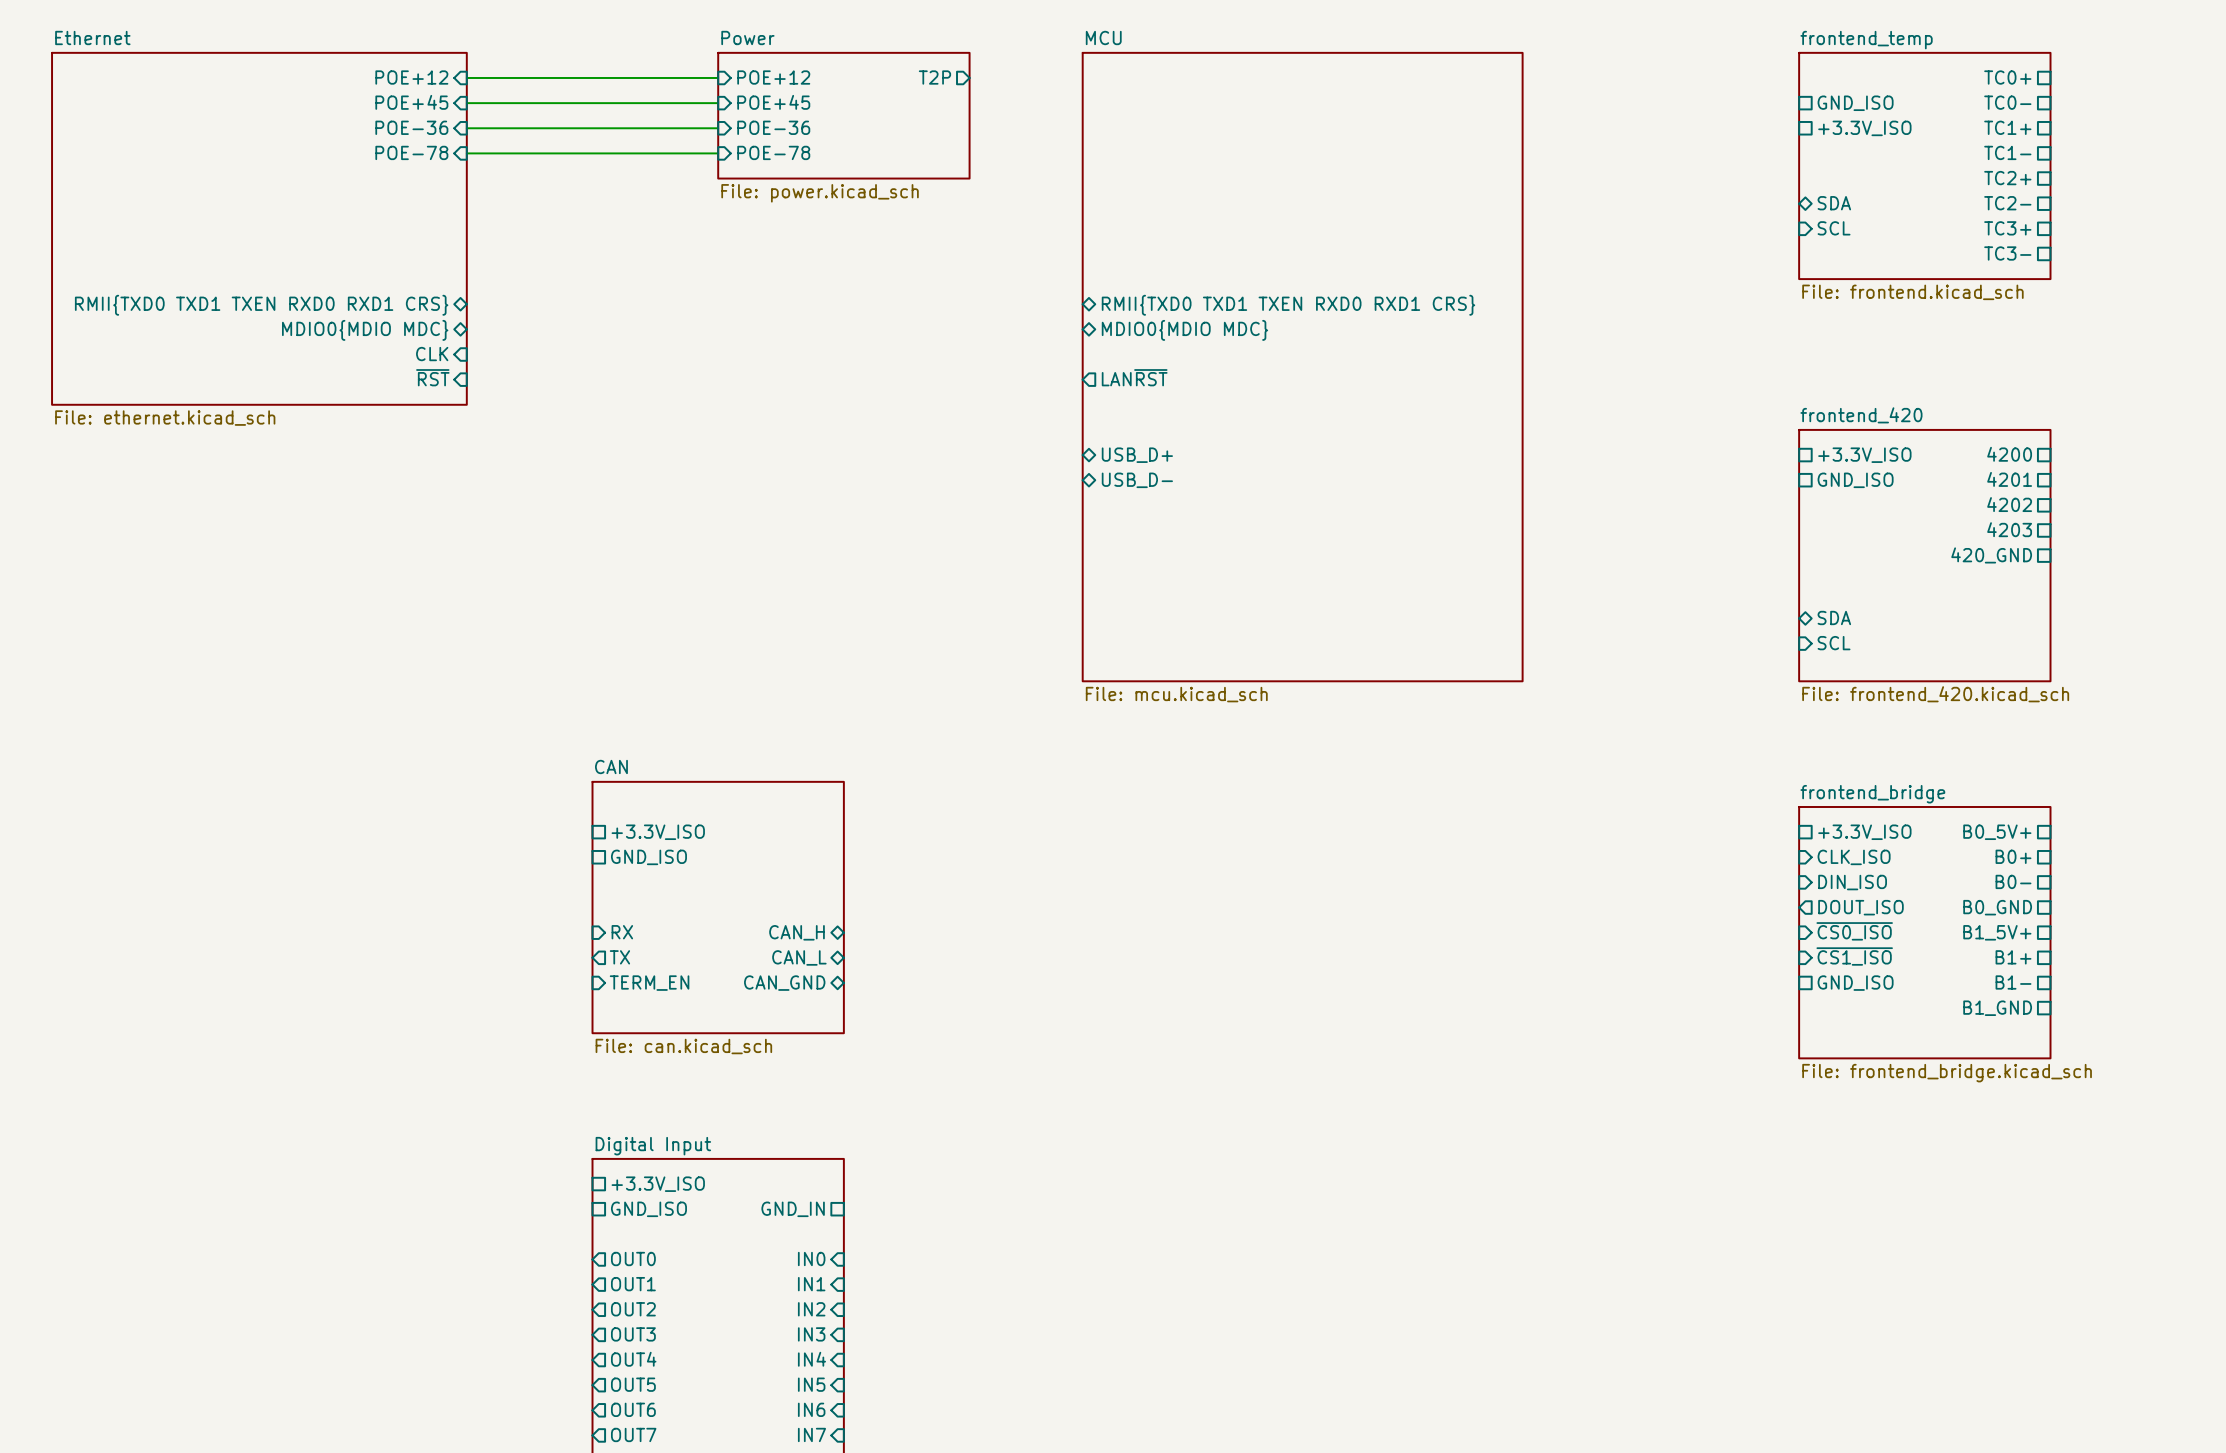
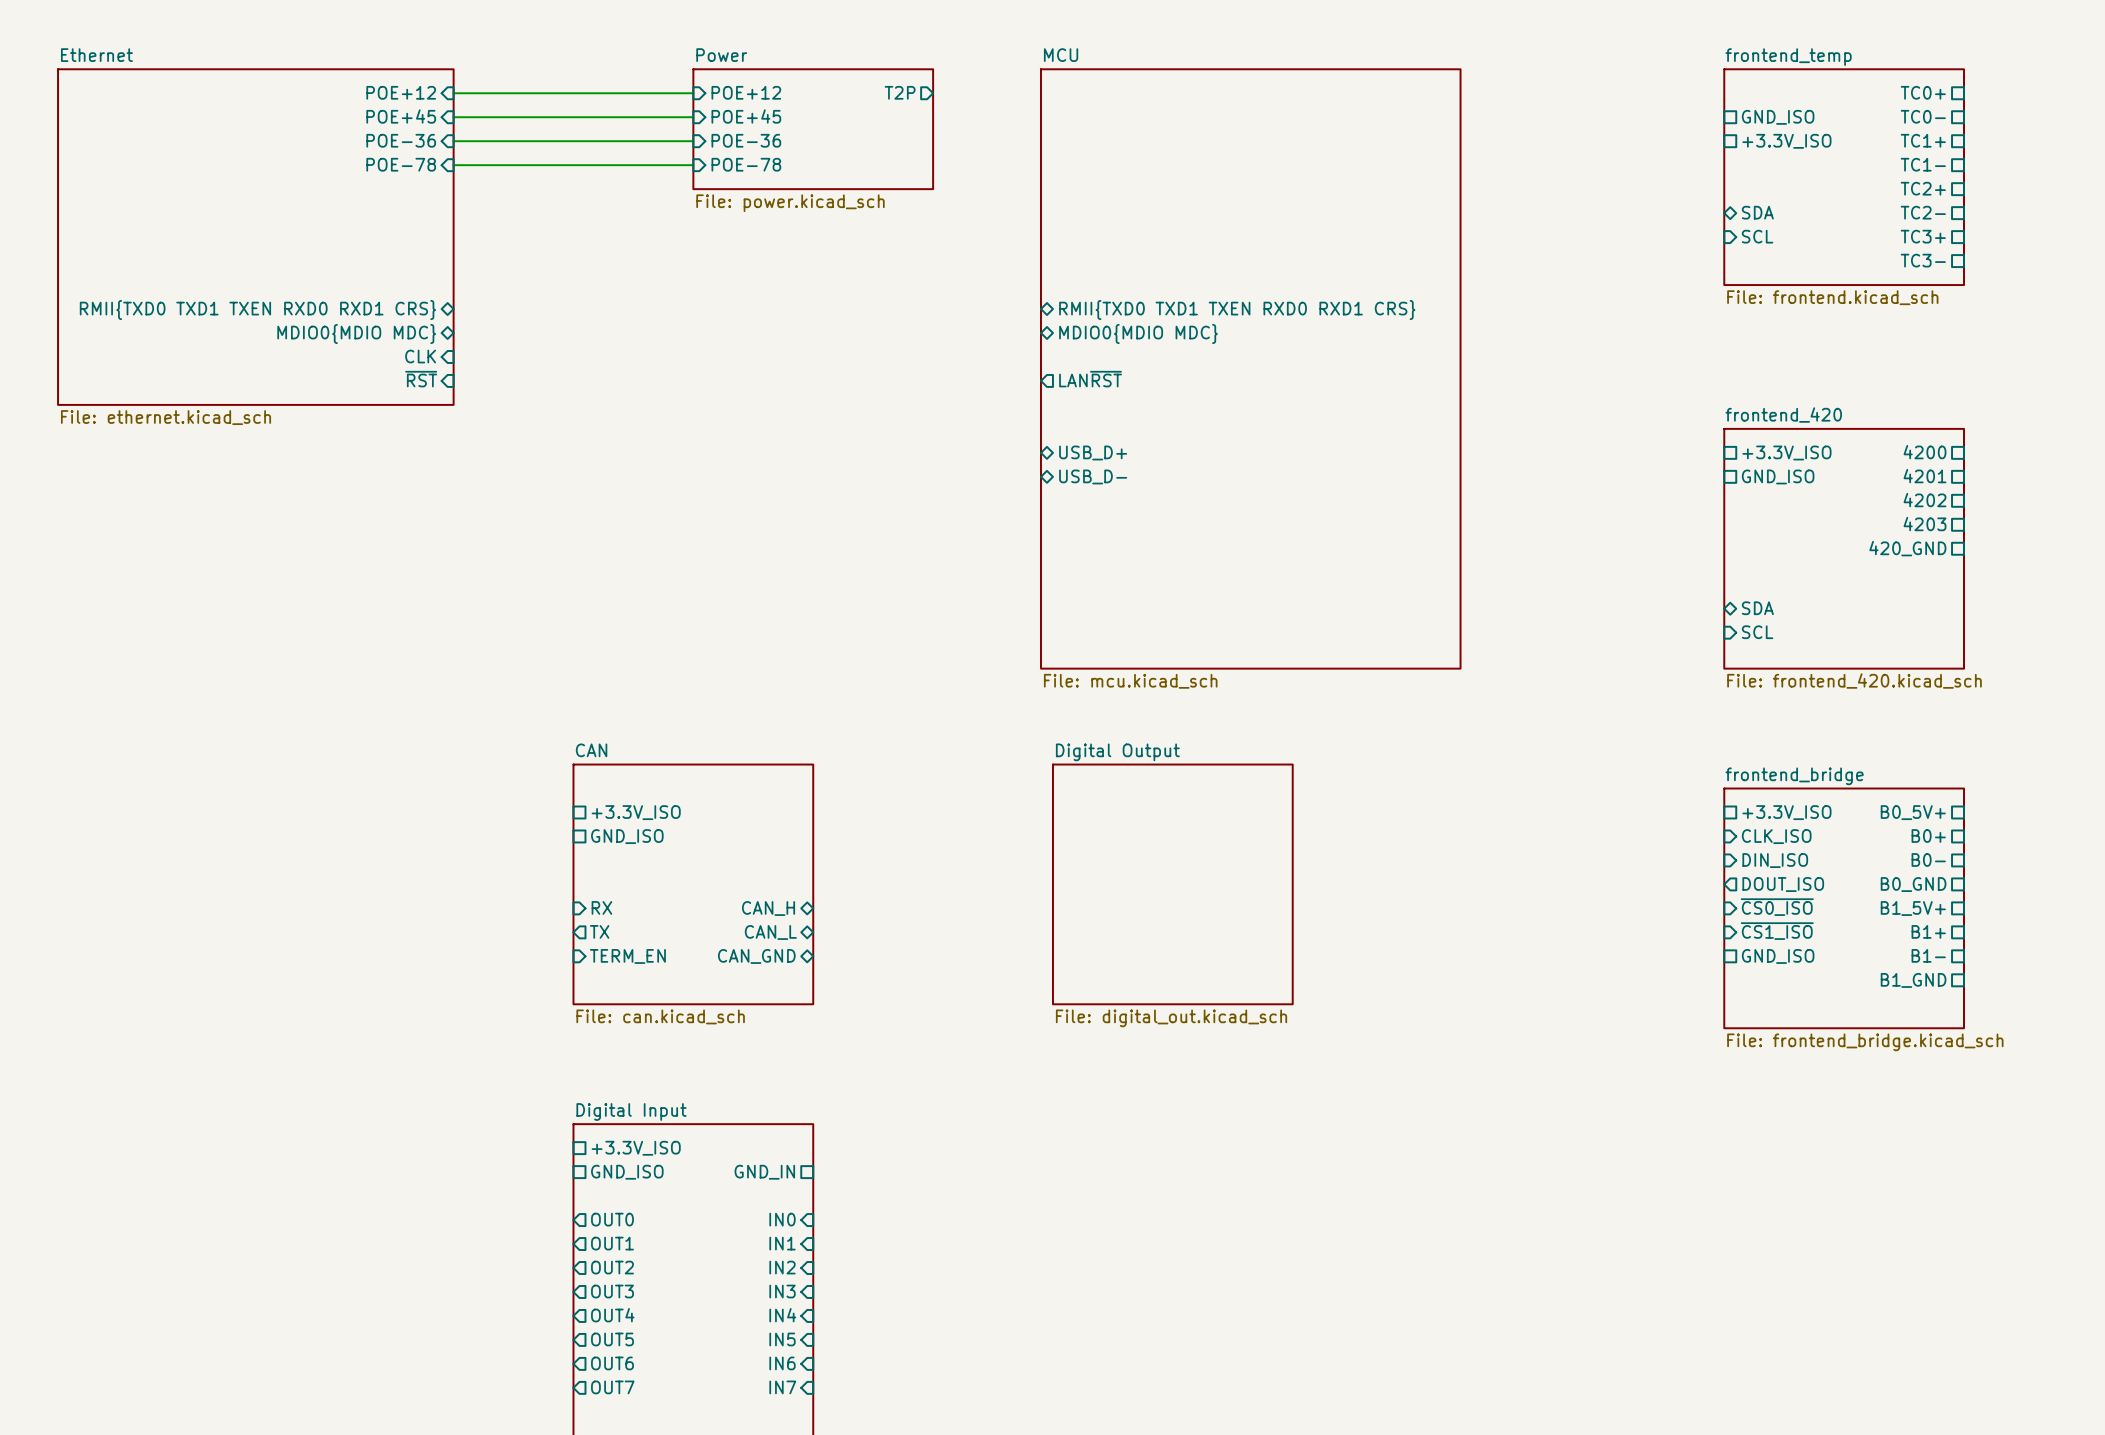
sheet Digital Output: none -> File: digital_out.kicad_sch (1172, 884)

